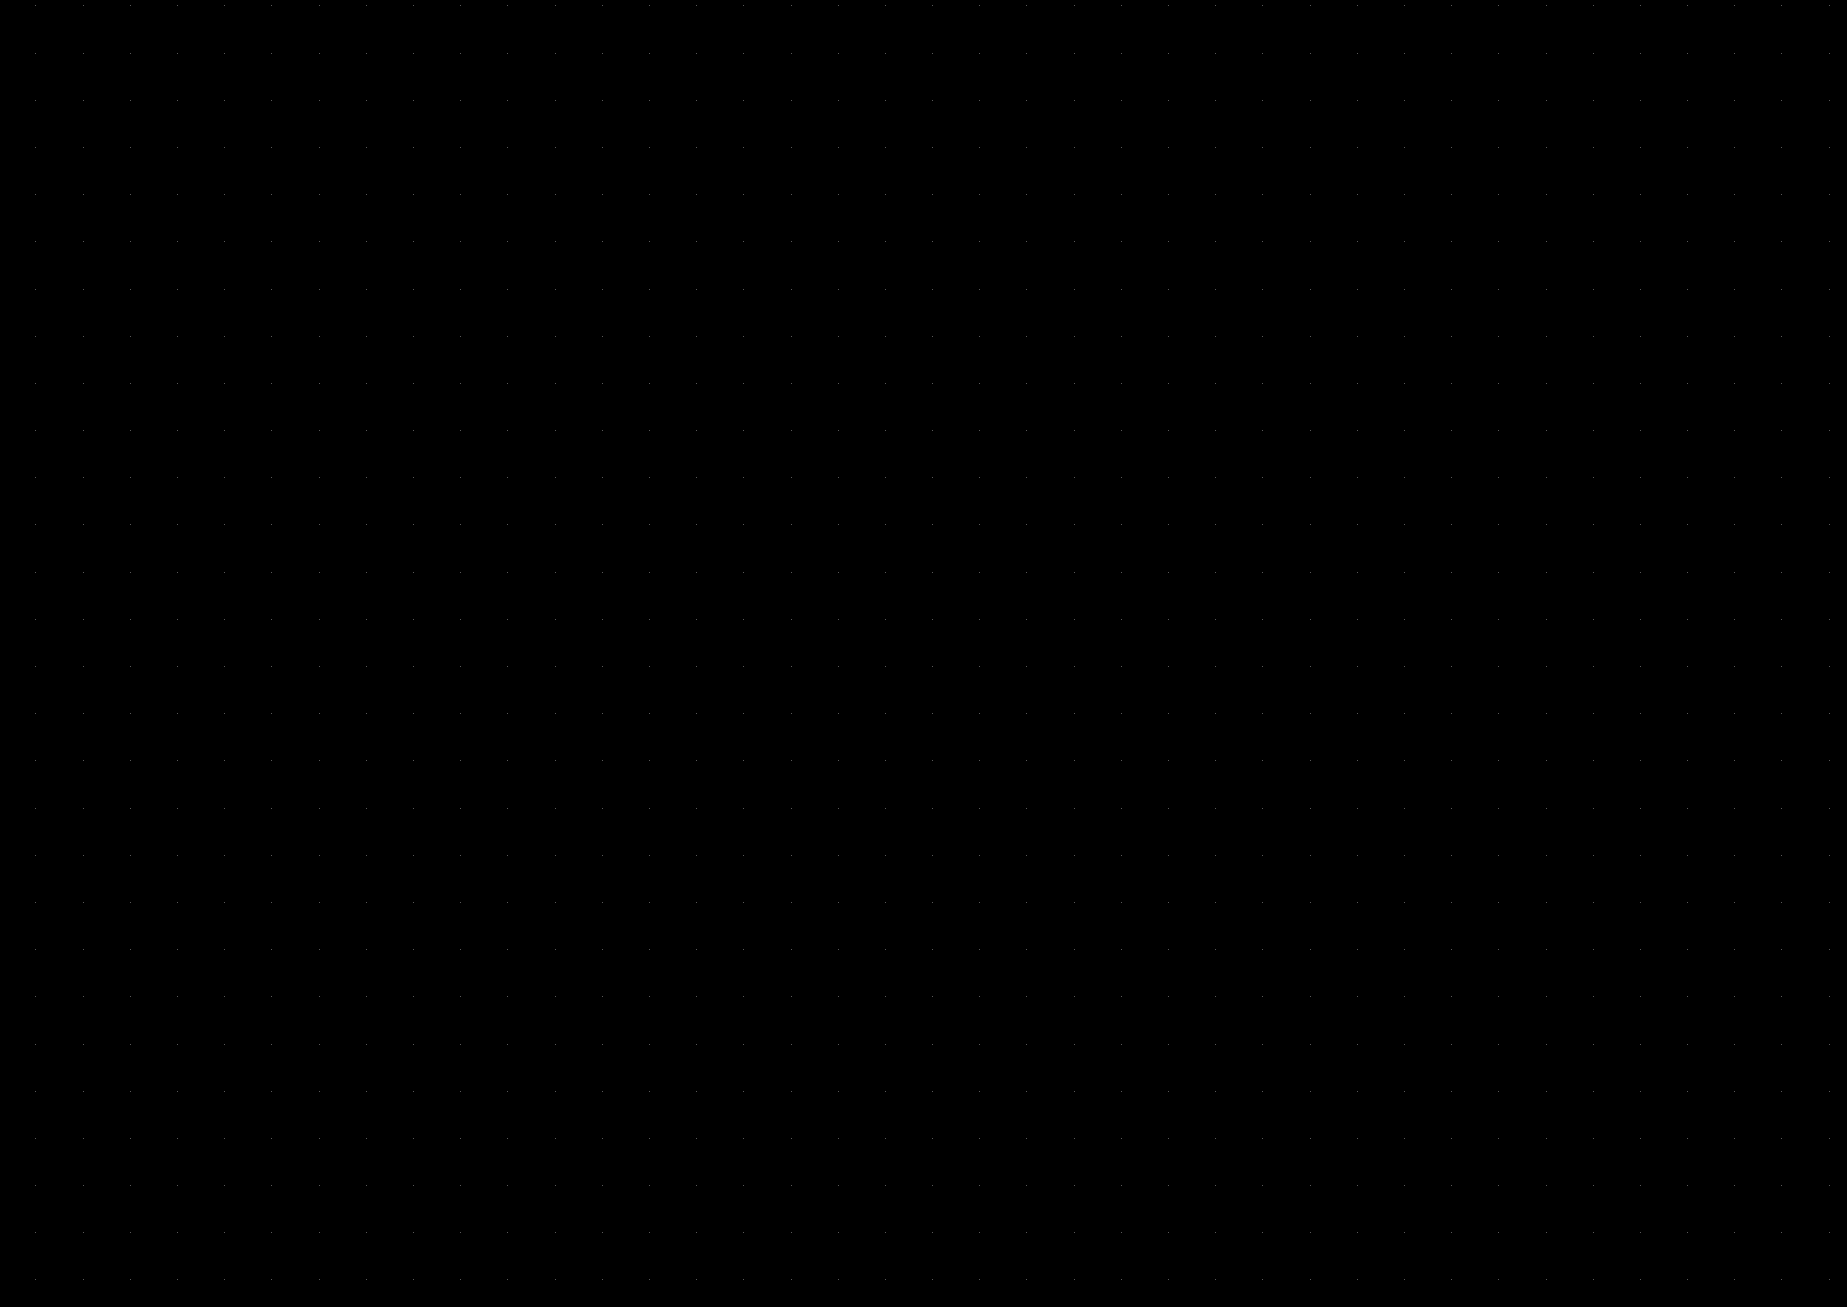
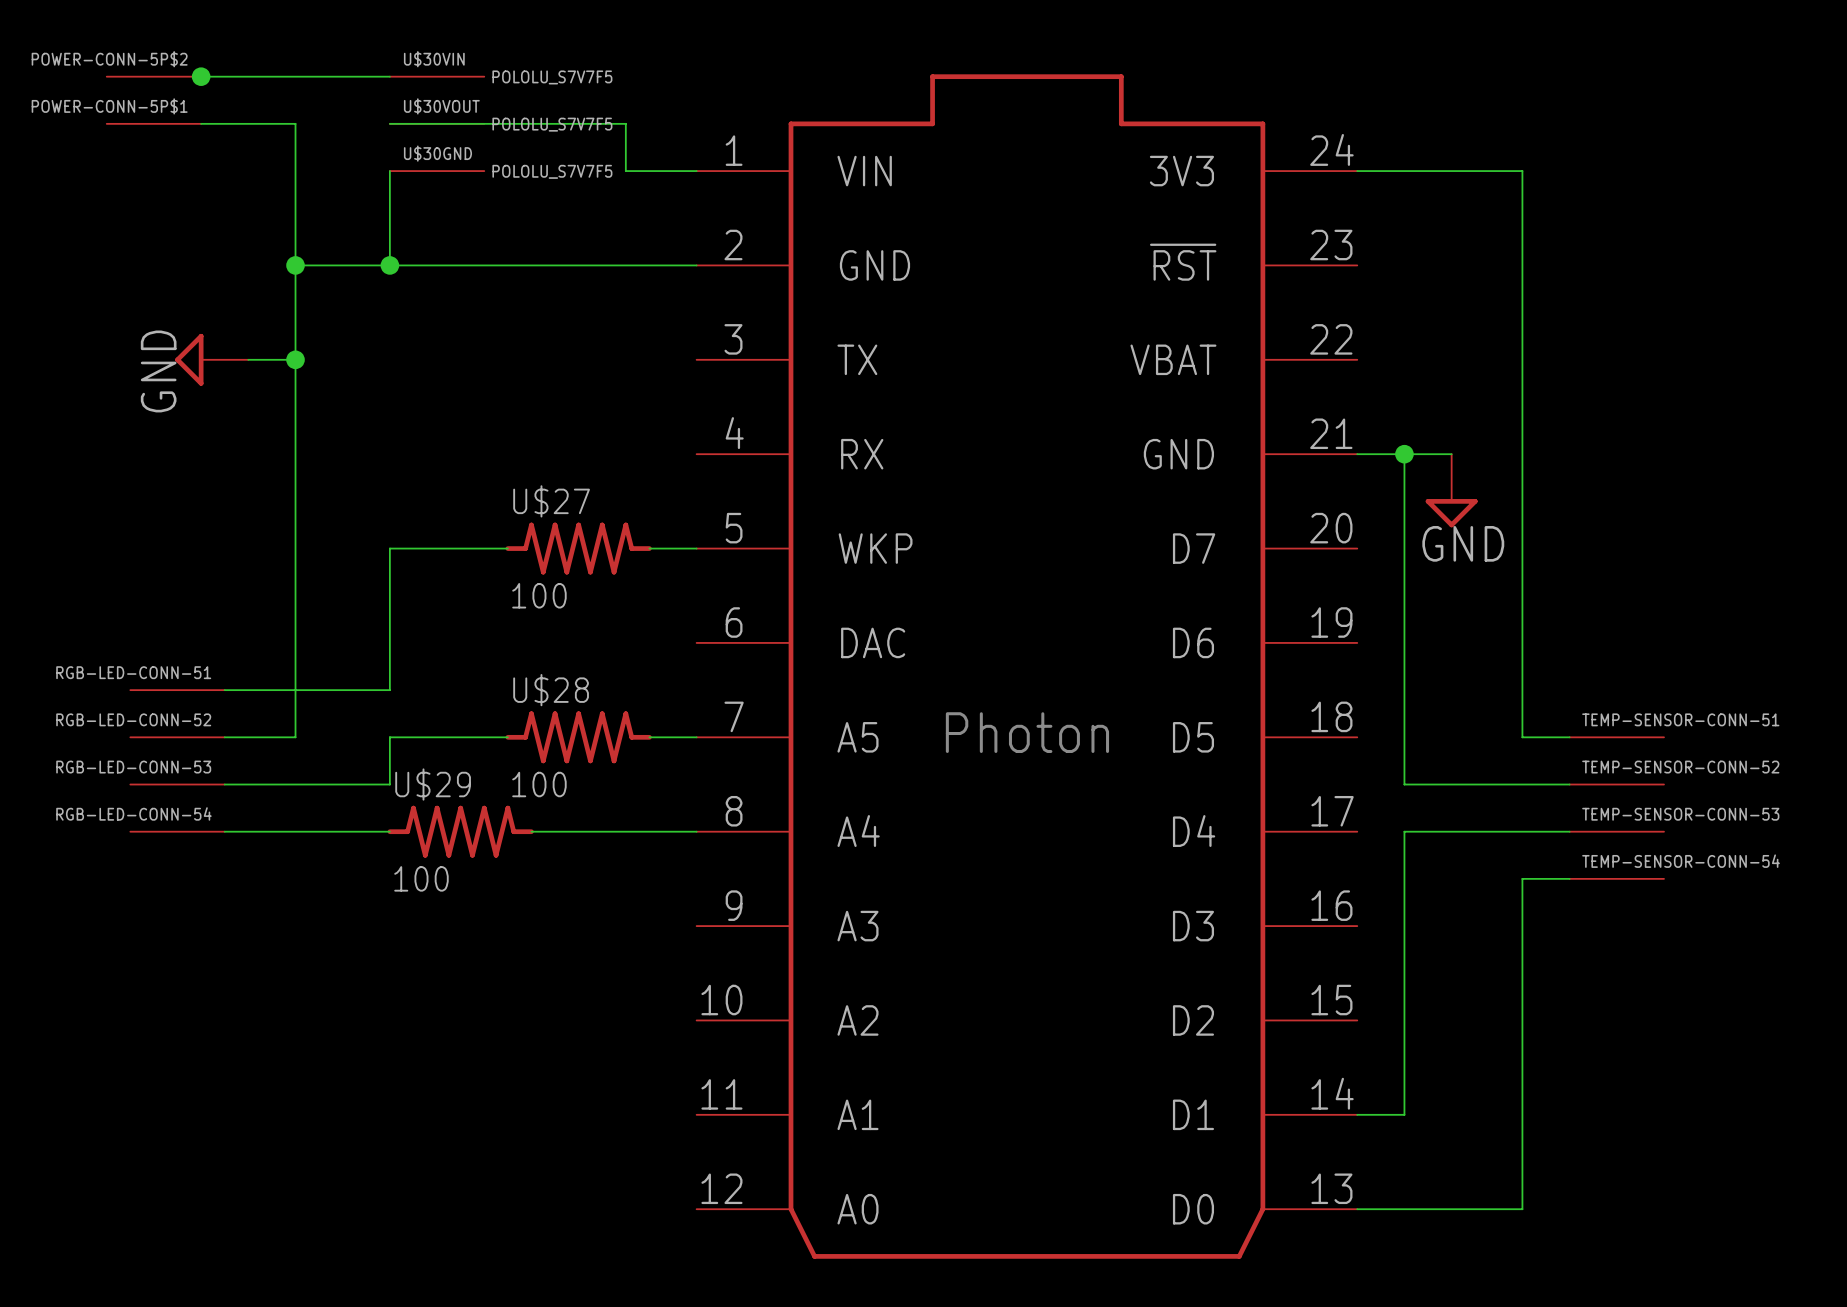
POWER-CONN-5P$2: none -> (153, 76)
wire: none -> (201, 76) (389, 76)
junction: none -> (201, 76)
U$30VIN: none -> POLOLU_S7V7F5 (437, 76)
POWER-CONN-5P$1: none -> (153, 123)
wire: none -> (201, 123) (295, 123) (295, 737) (224, 737)
wire: none -> (389, 123) (625, 123) (625, 171) (696, 171)
U$30VOUT: none -> POLOLU_S7V7F5 (437, 123)
wire: none -> (389, 171) (389, 265)
U$30GND: none -> POLOLU_S7V7F5 (437, 171)
wire: none -> (1357, 171) (1522, 171) (1522, 737) (1569, 737)
wire: none -> (295, 265) (696, 265)
junction: none -> (295, 265)
junction: none -> (389, 265)
power symbol: none -> GND (211, 359)
wire: none -> (248, 359) (295, 359)
junction: none -> (295, 359)
wire: none -> (1357, 454) (1451, 454)
wire: none -> (1404, 454) (1404, 784) (1569, 784)
junction: none -> (1404, 454)
power symbol: none -> GND (1451, 490)
wire: none -> (507, 548) (389, 548) (389, 690) (224, 690)
U$27: none -> 100 (578, 548)
wire: none -> (649, 548) (696, 548)
part: none -> (1026, 666)
RGB-LED-CONN-51: none -> (177, 690)
RGB-LED-CONN-52: none -> (177, 737)
wire: none -> (507, 737) (389, 737) (389, 784) (224, 784)
U$28: none -> 100 (578, 737)
wire: none -> (649, 737) (696, 737)
TEMP-SENSOR-CONN-51: none -> (1616, 737)
RGB-LED-CONN-53: none -> (177, 784)
TEMP-SENSOR-CONN-52: none -> (1616, 784)
RGB-LED-CONN-54: none -> (177, 831)
wire: none -> (224, 831) (389, 831)
U$29: none -> 100 (460, 831)
wire: none -> (531, 831) (696, 831)
wire: none -> (1569, 831) (1404, 831) (1404, 1114) (1357, 1114)
TEMP-SENSOR-CONN-53: none -> (1616, 831)
wire: none -> (1569, 878) (1522, 878) (1522, 1209) (1357, 1209)
TEMP-SENSOR-CONN-54: none -> (1616, 878)

